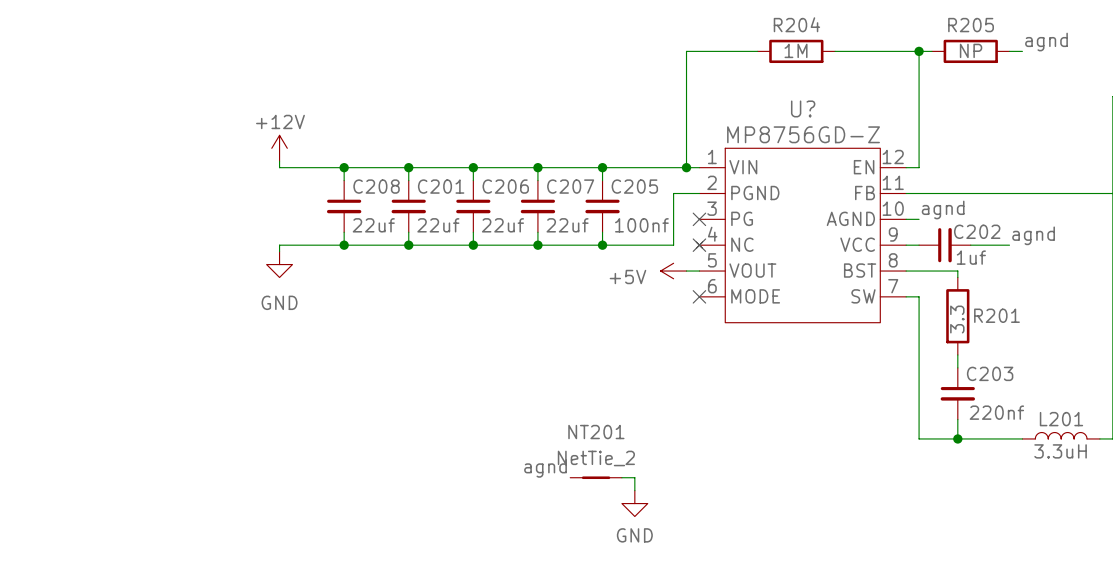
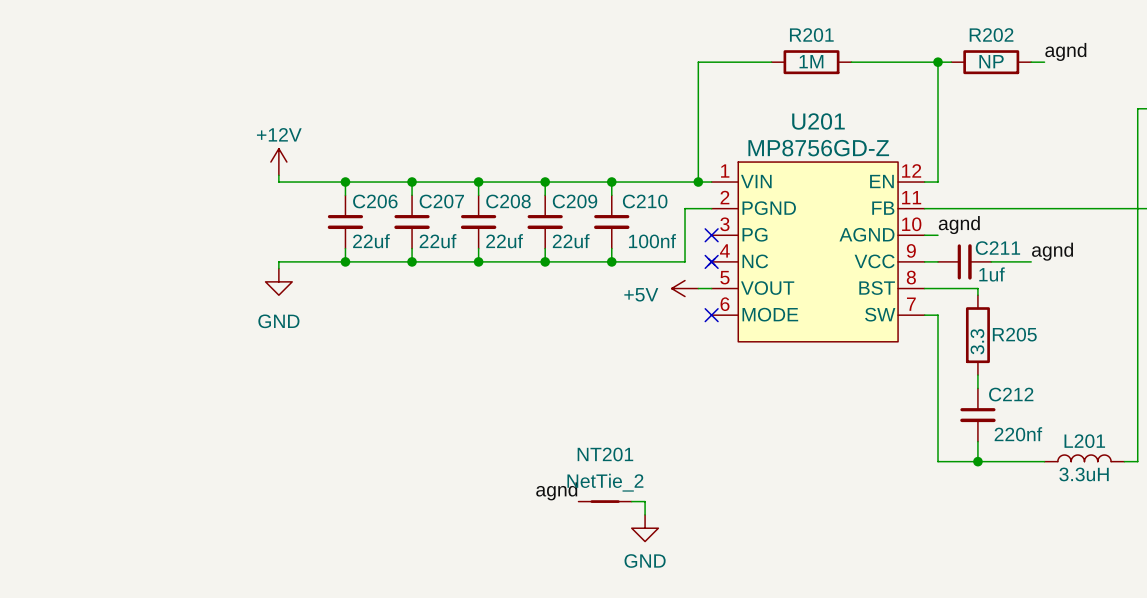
R204 name: R204 (796, 24) -> R201 (811, 35)
R205 name: R205 (971, 25) -> R202 (991, 35)
U? name: U? (803, 108) -> U201 (818, 121)
C208 name: C208 (376, 186) -> C206 (375, 201)
C201 name: C201 (441, 186) -> C207 (441, 201)
C206 name: C206 (505, 186) -> C208 (508, 201)
C207 name: C207 (570, 186) -> C209 (575, 201)
C205 name: C205 (634, 186) -> C210 (645, 201)
C202 name: C202 (977, 231) -> C211 (997, 248)
R201 name: R201 (996, 315) -> R205 (1014, 334)
C203 name: C203 (990, 373) -> C212 (1011, 394)

